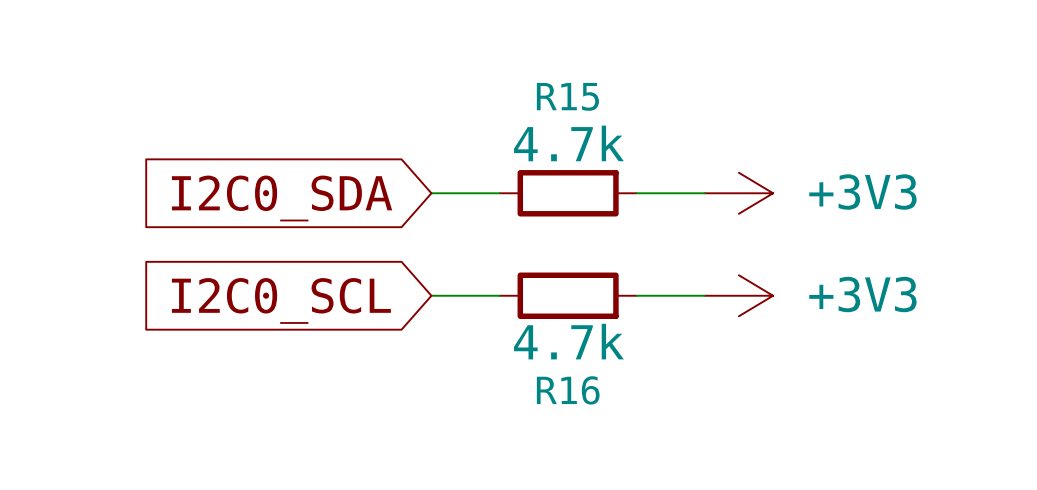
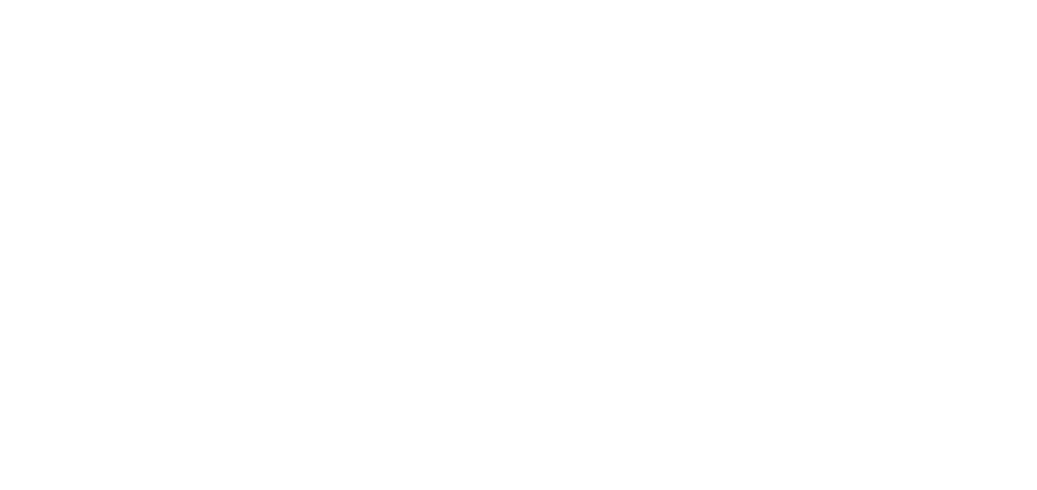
wire: (431, 193) (499, 193) -> none
R15: 4.7k (568, 193) -> none
wire: (636, 193) (704, 193) -> none
power symbol: +3V3 (738, 193) -> none
global label: I2C0_SDA (282, 198) -> none
wire: (431, 295) (499, 295) -> none
R16: 4.7k (568, 295) -> none
wire: (636, 295) (704, 295) -> none
power symbol: +3V3 (738, 295) -> none
global label: I2C0_SCL (281, 300) -> none

